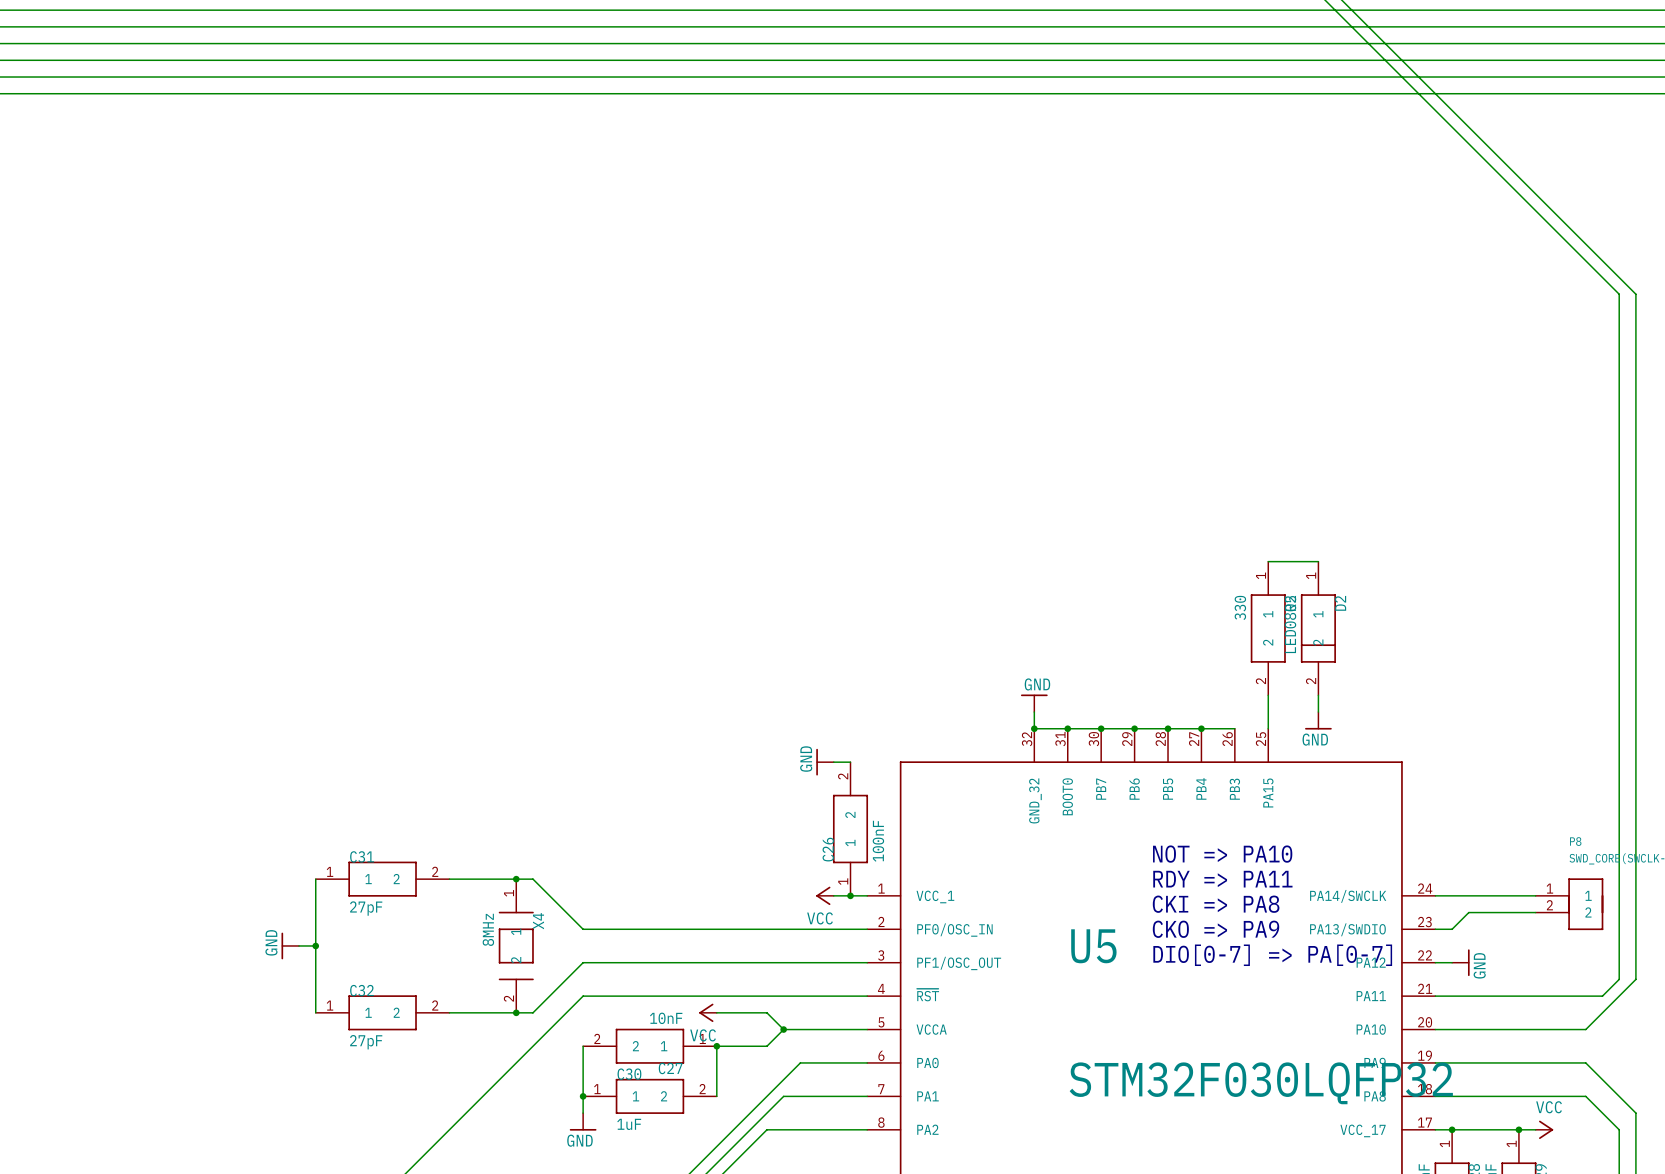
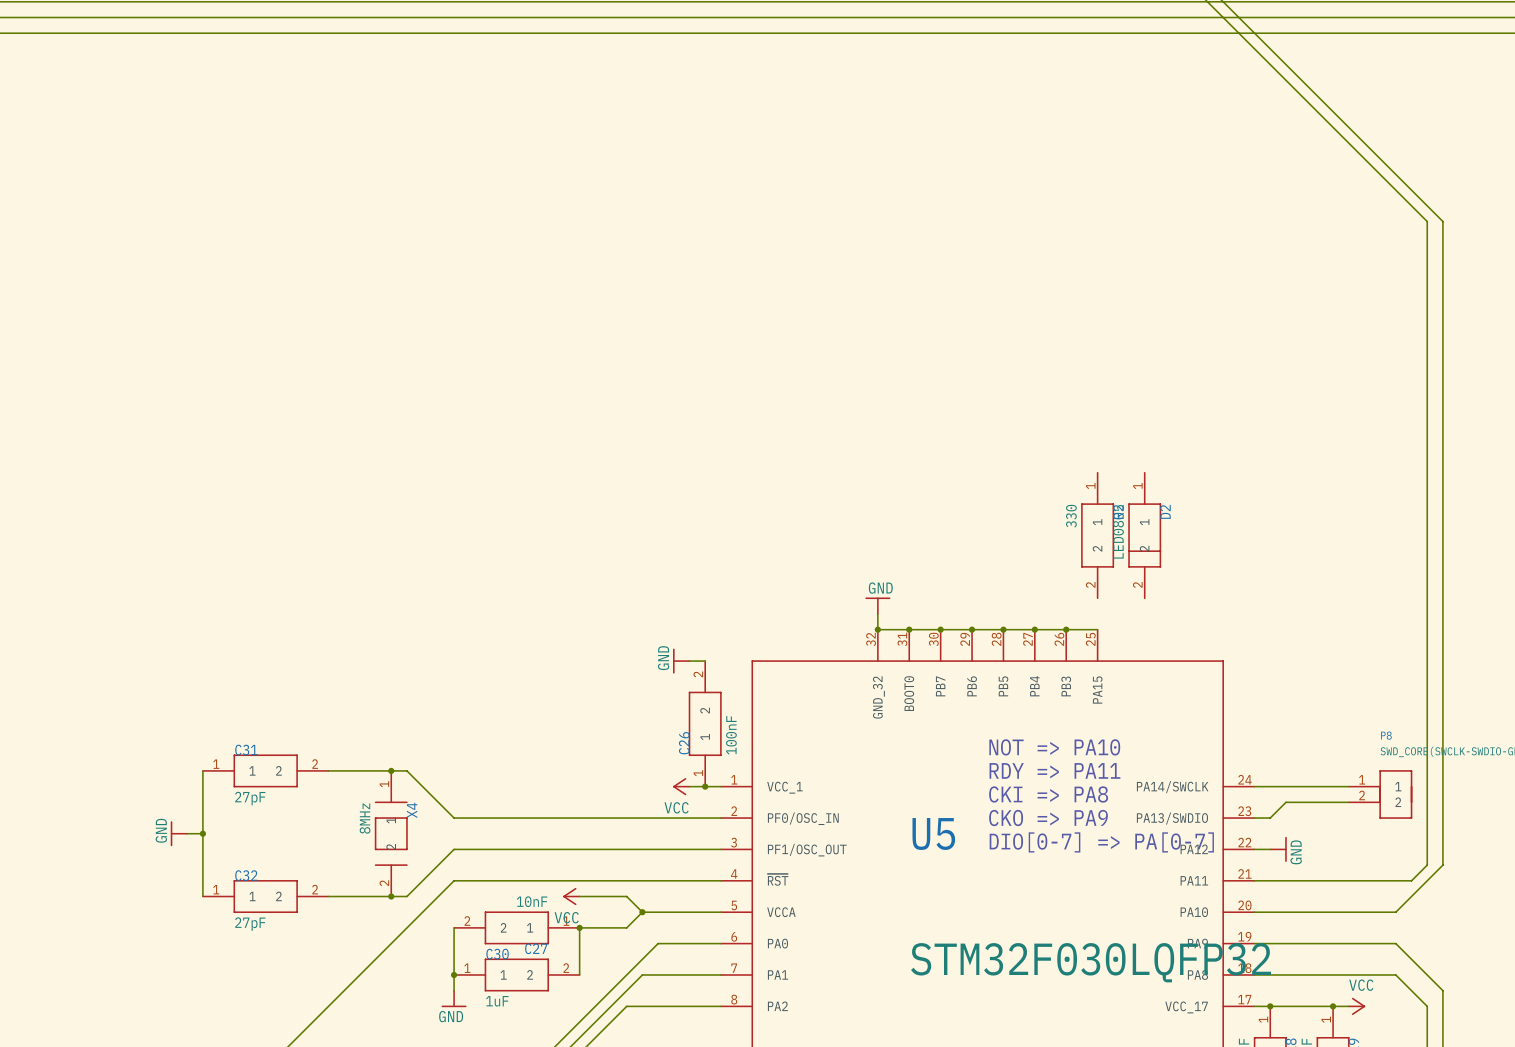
wire: (1268, 561) (1318, 561) -> none
wire: (1268, 695) (1268, 728) -> (1066, 629) (1097, 629)
wire: (1318, 695) (1318, 712) -> none
power symbol: GND (1318, 720) -> none
junction: none -> (1066, 629)

